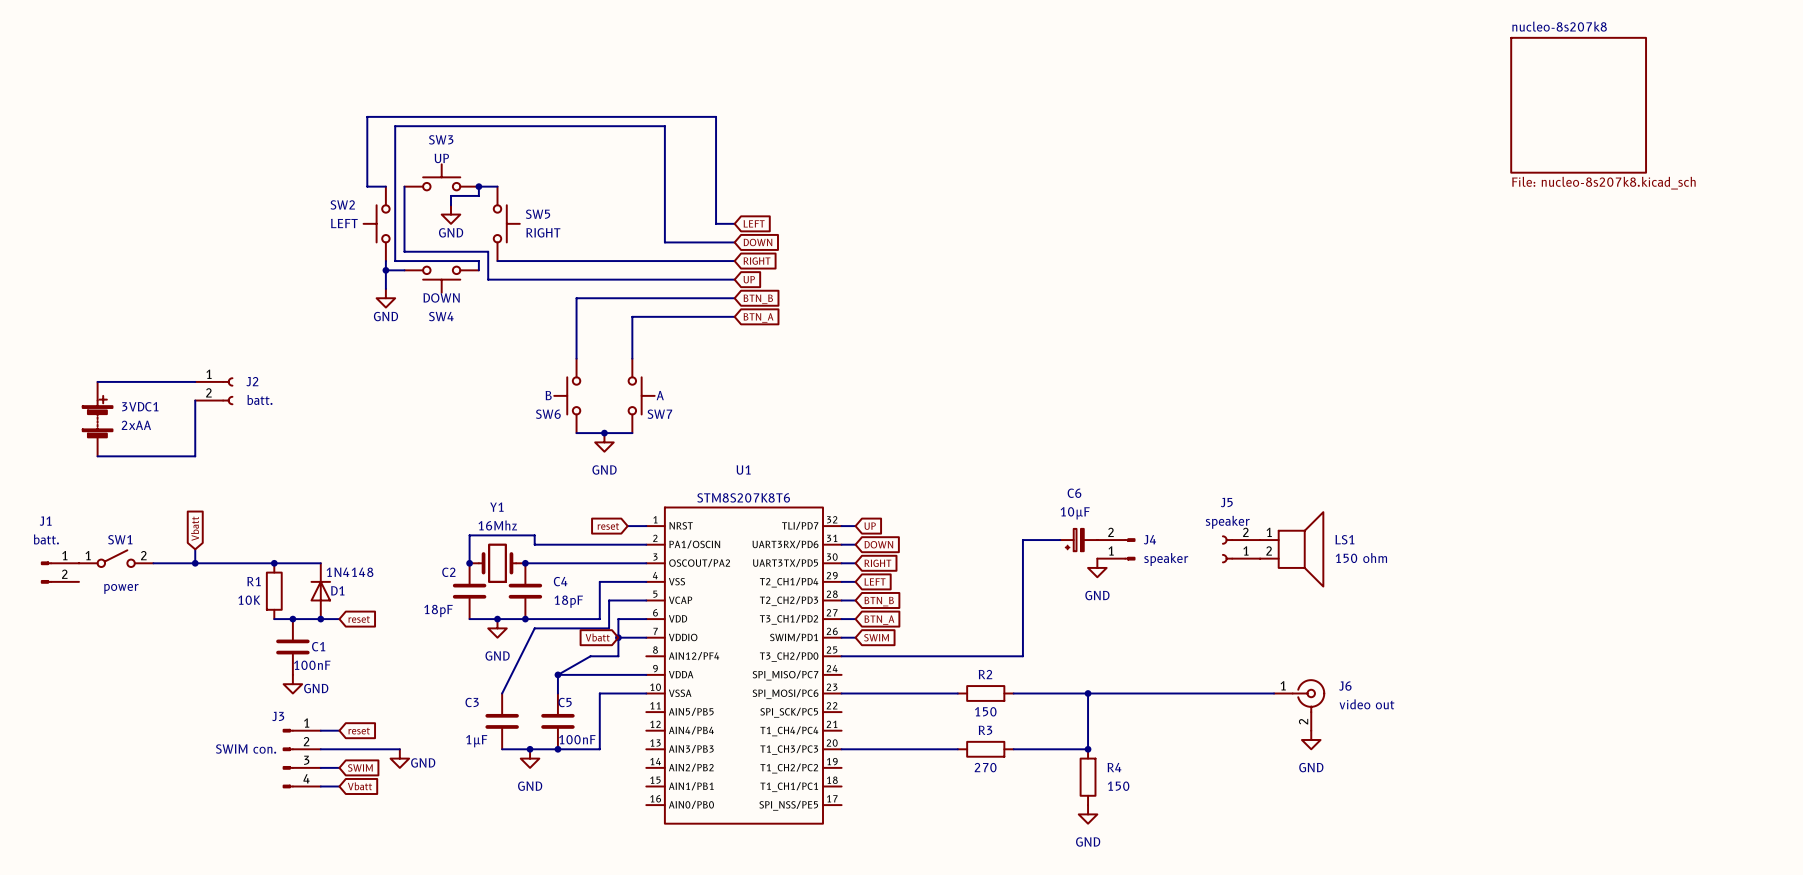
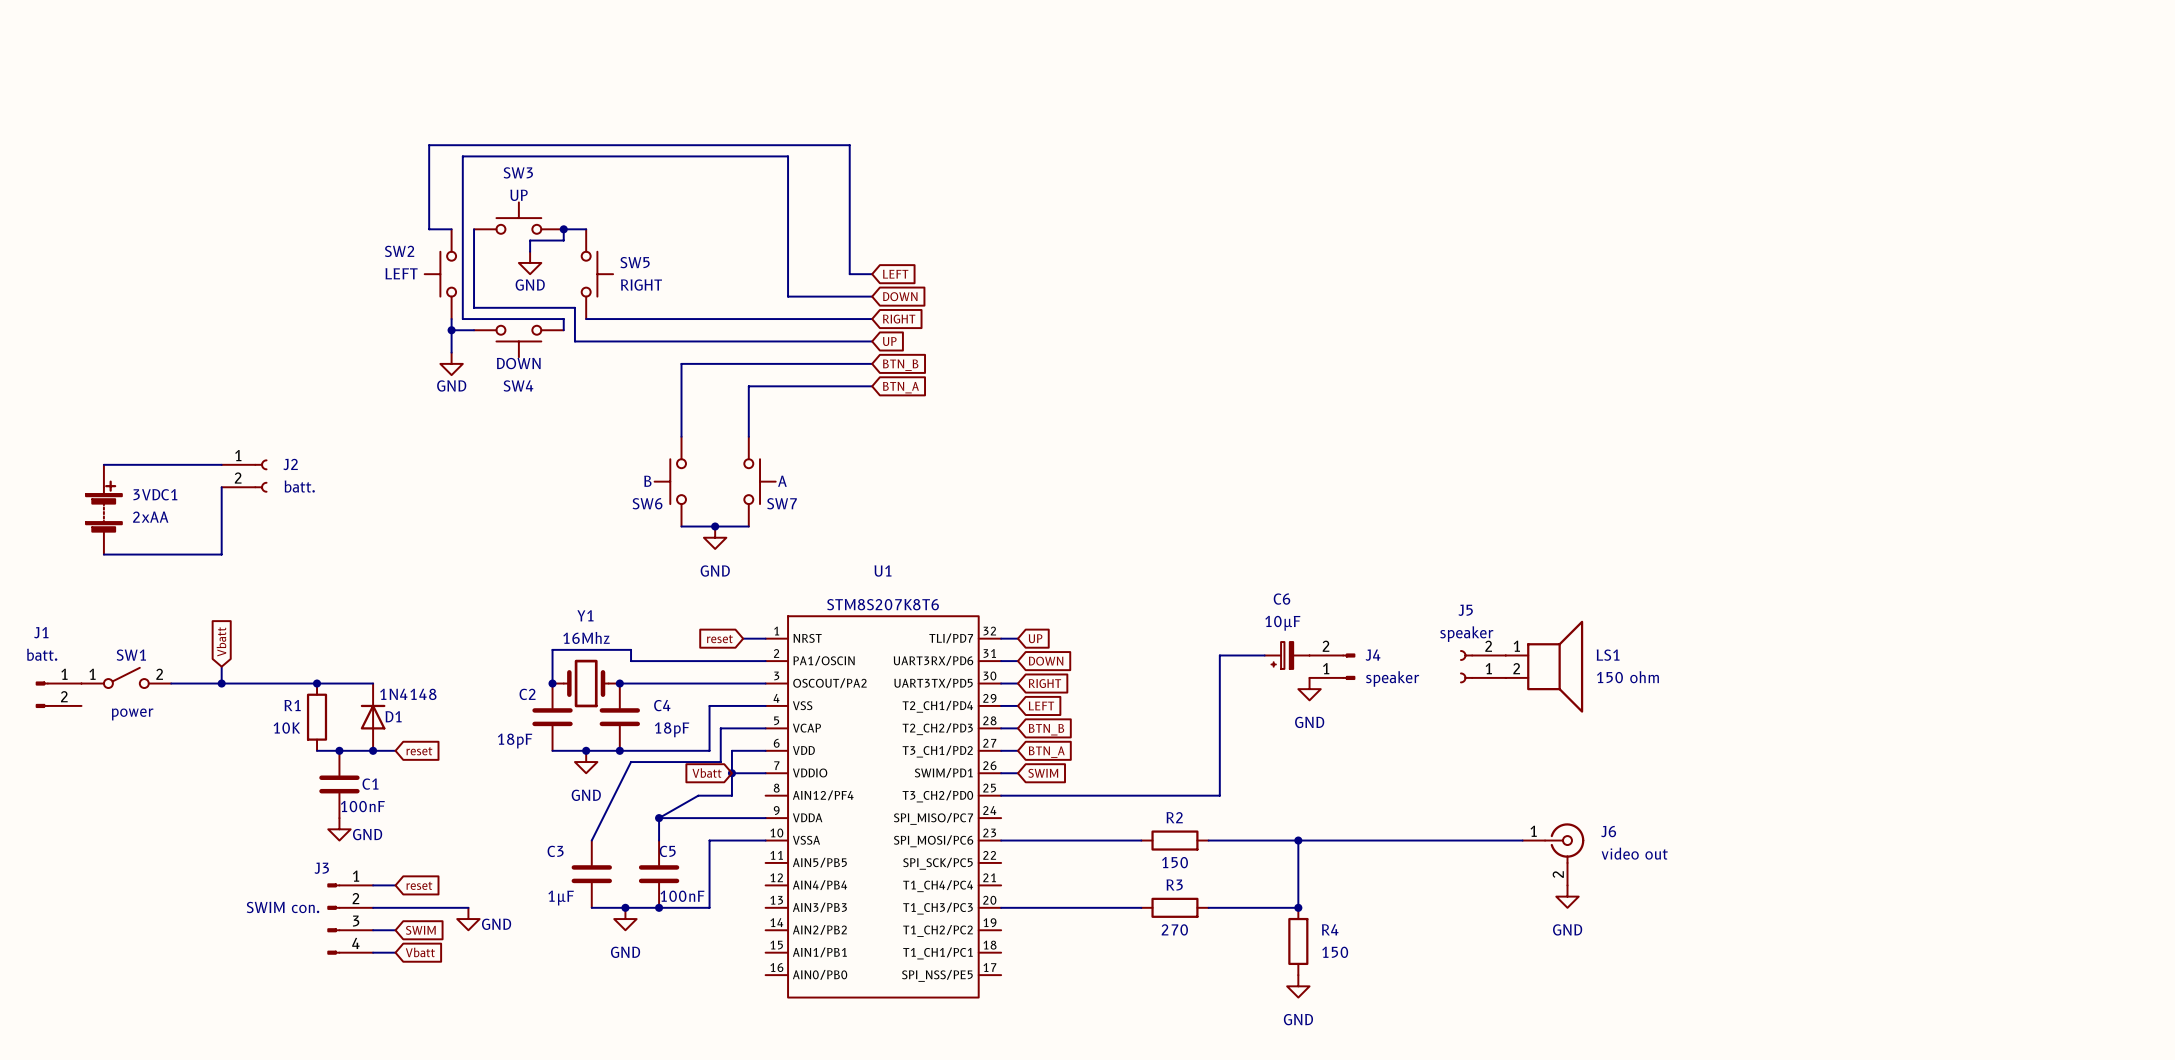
sheet nucleo-8s207k8: File: nucleo-8s207k8.kicad_sch (1578, 105) -> none

